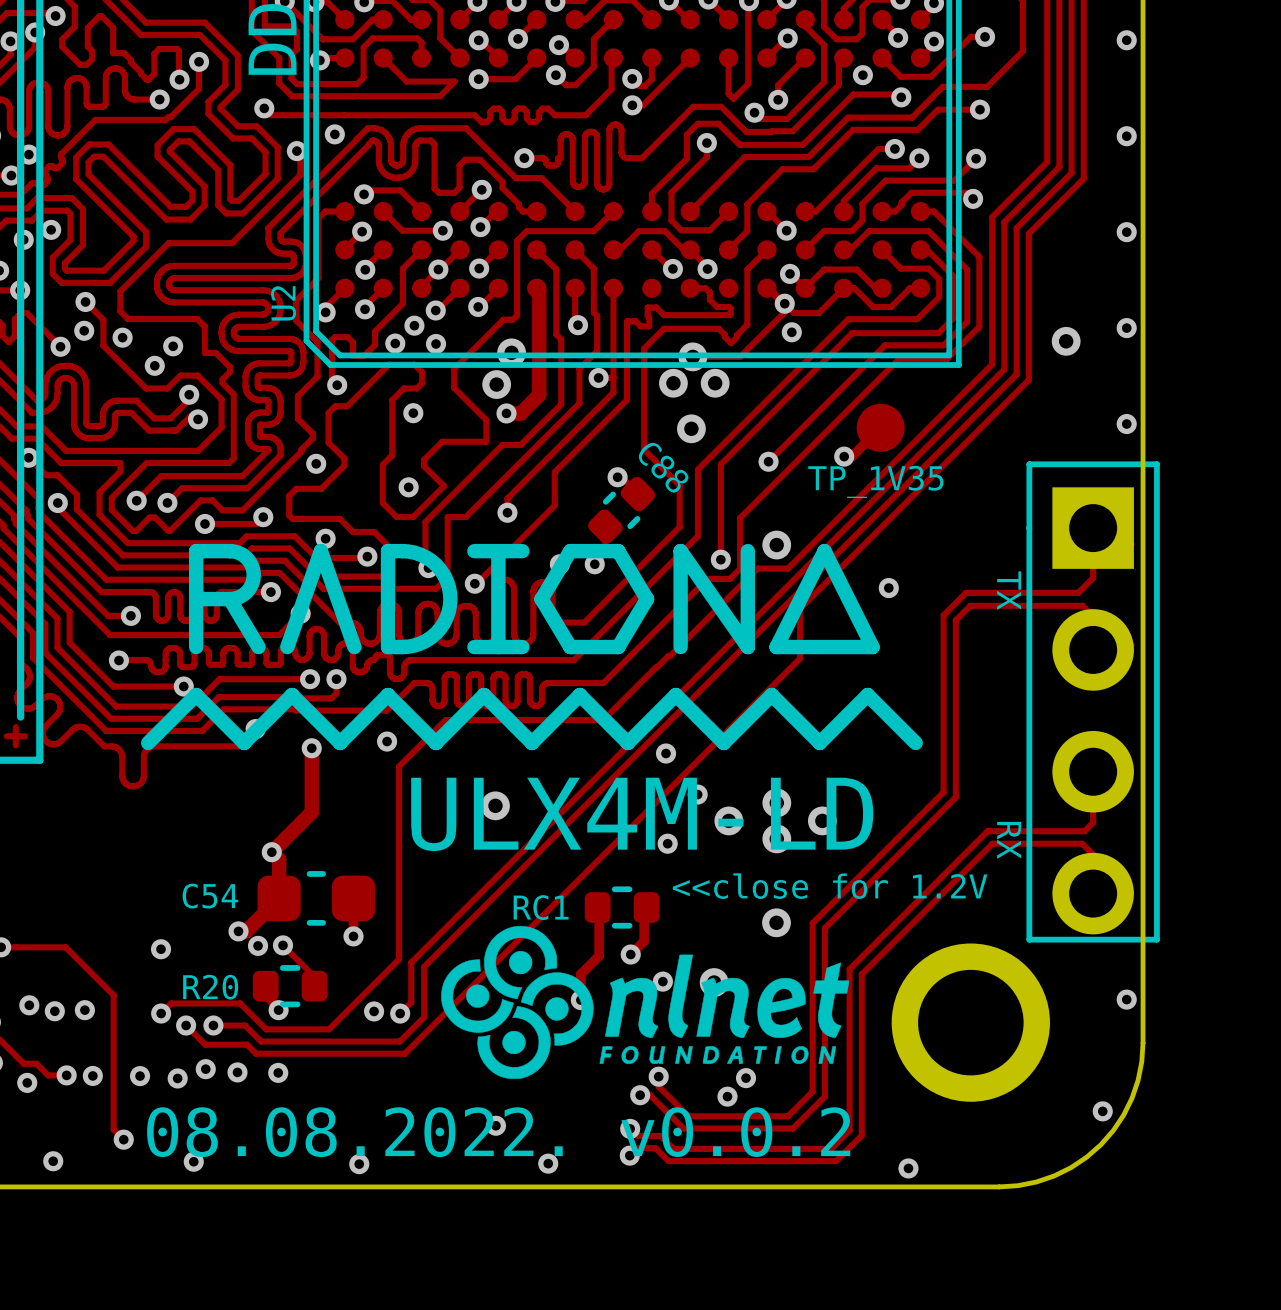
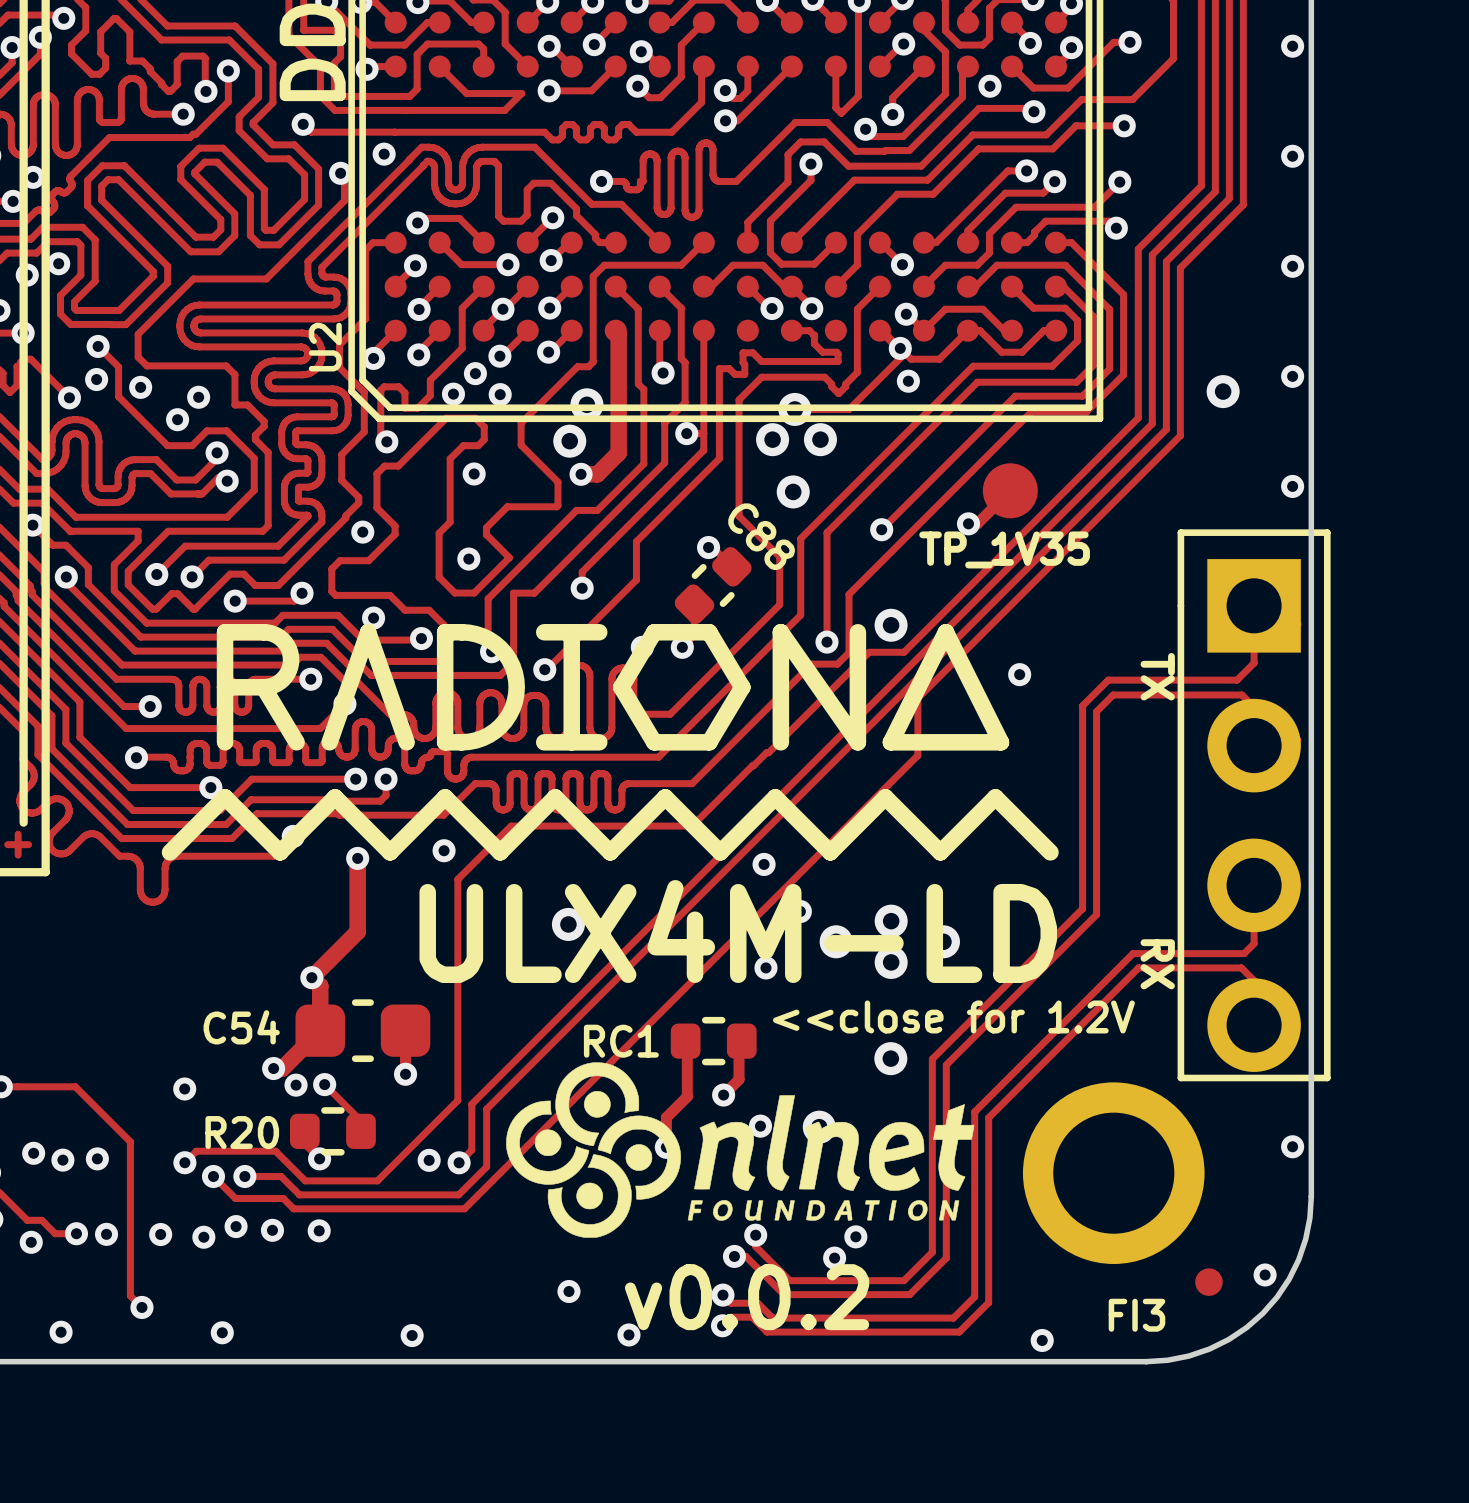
FI3: none -> (1208, 1282)
text: none -> v0.0.2 (747, 1297)
text: 08.08.2022. v0.0.2 (498, 1132) -> none

